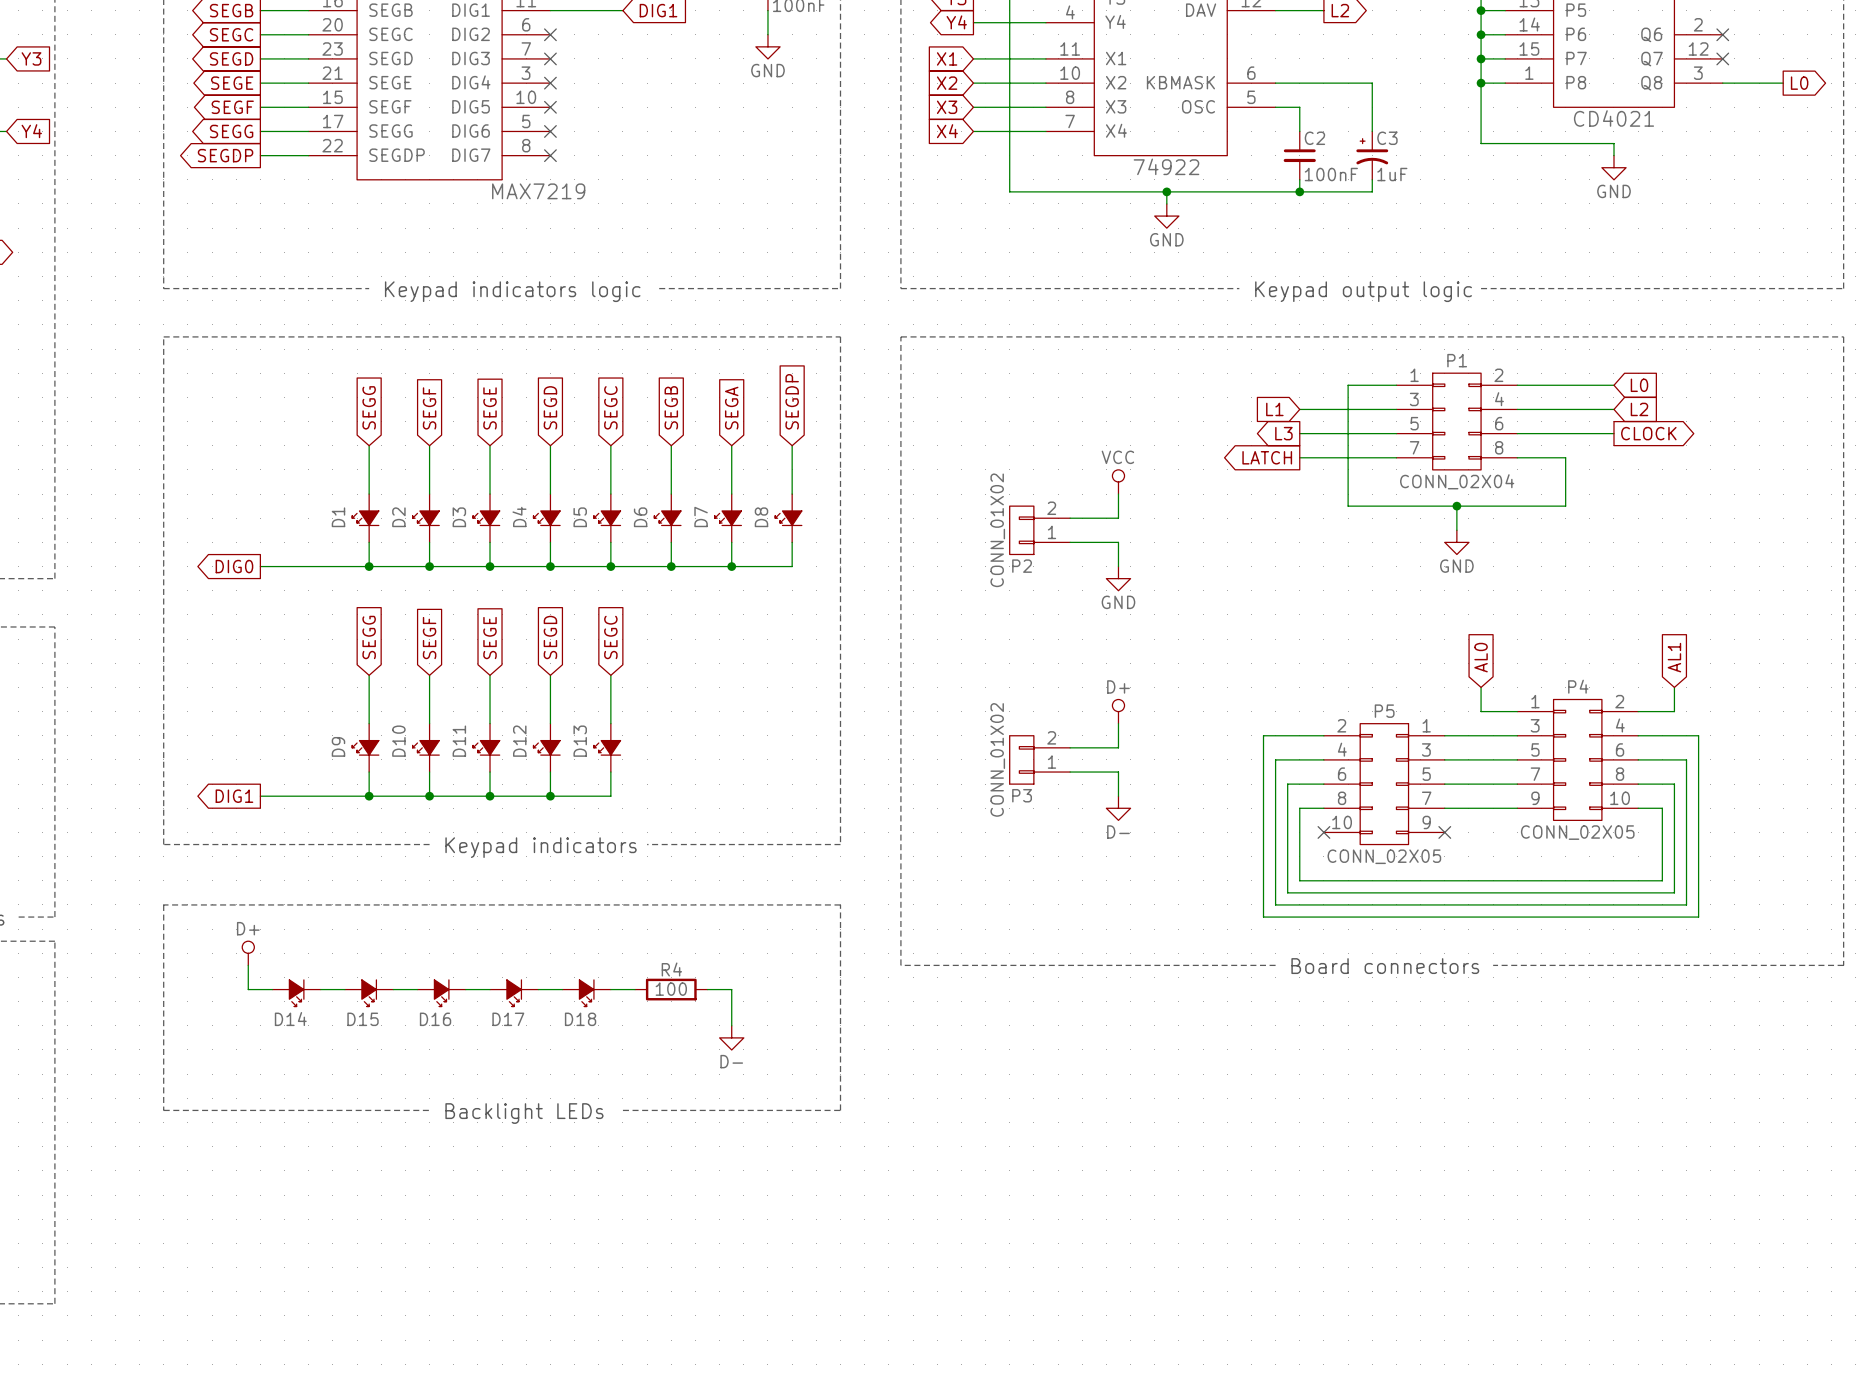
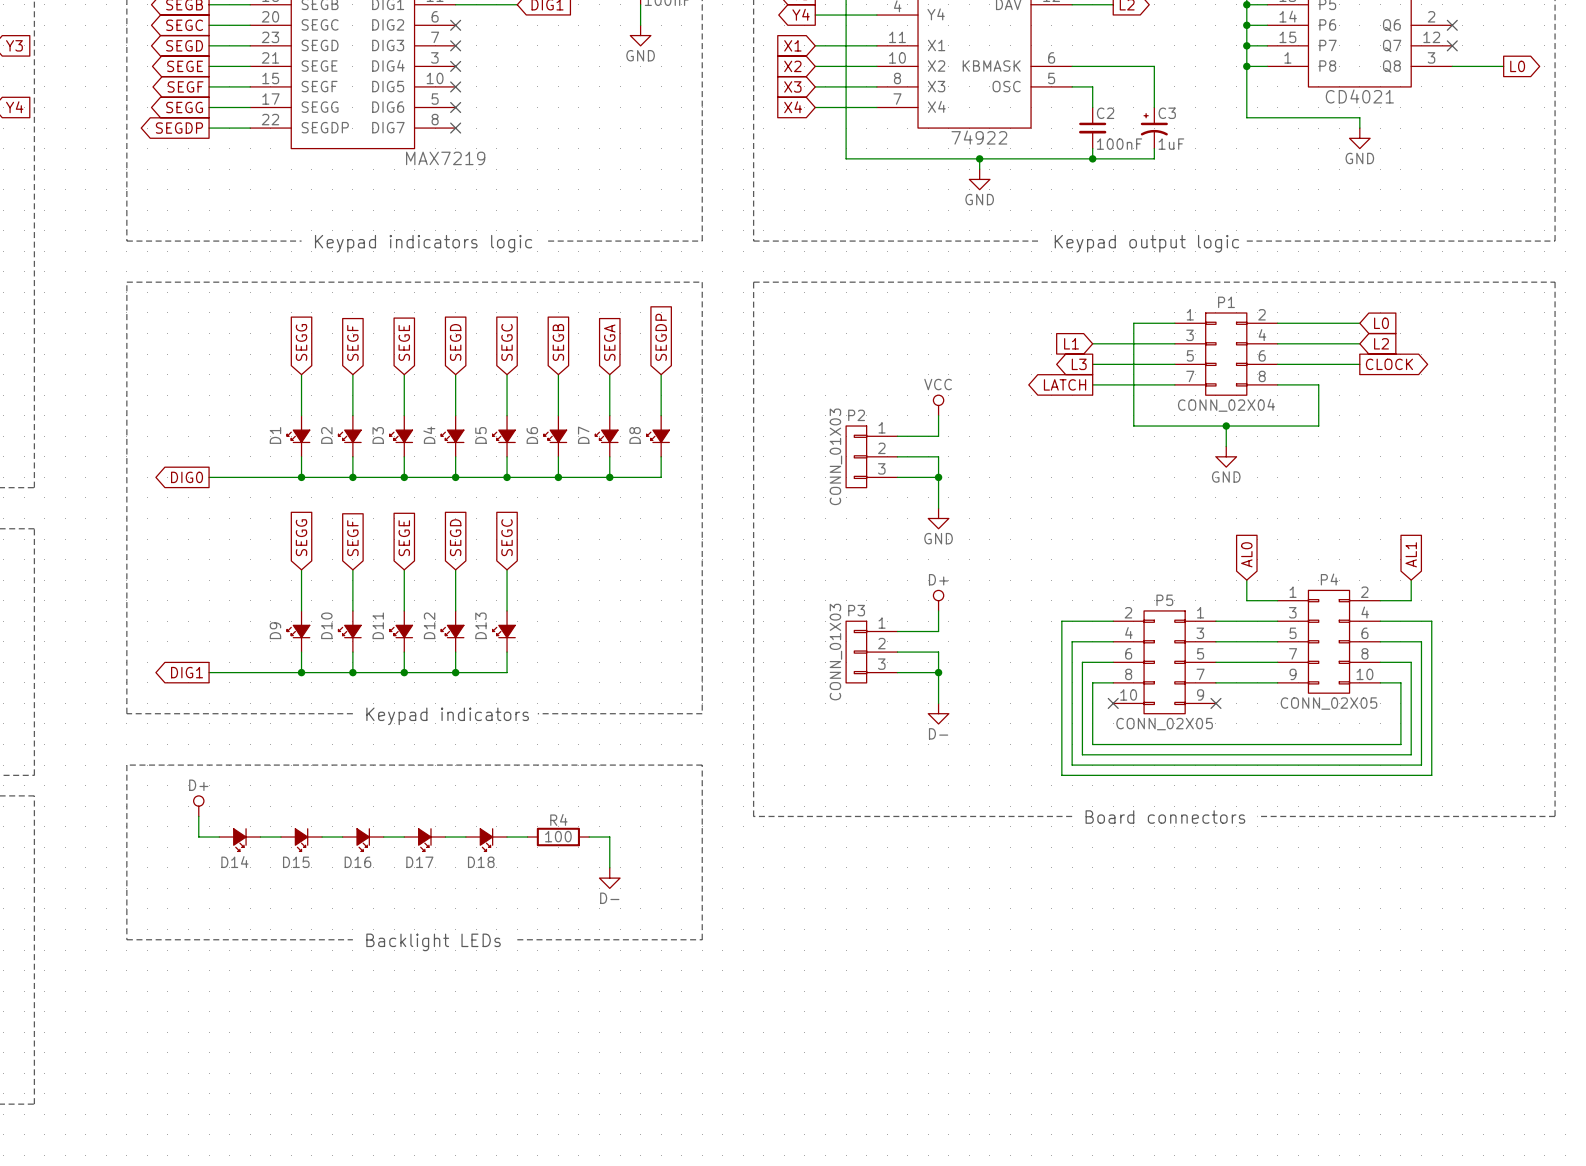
P2 symbol: [1009, 506, 1071, 555] -> [846, 426, 898, 488]
P2 value: CONN_01X02 (997, 530) -> CONN_01X03 (835, 456)
P2 name position: P2 (1022, 566) -> P2 (856, 415)
wire: none -> (897, 477) (938, 477) (938, 508)
junction: none -> (938, 477)
power symbol position: GND (1118, 578) -> GND (938, 518)
P3 symbol: [1009, 735, 1071, 785] -> [846, 621, 898, 683]
P3 value: CONN_01X02 (997, 759) -> CONN_01X03 (835, 652)
P3 name position: P3 (1022, 795) -> P3 (856, 610)
wire: none -> (897, 672) (938, 672) (938, 703)
junction: none -> (938, 672)
power symbol position: D- (1118, 808) -> D- (938, 713)

